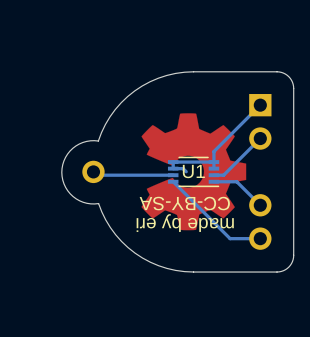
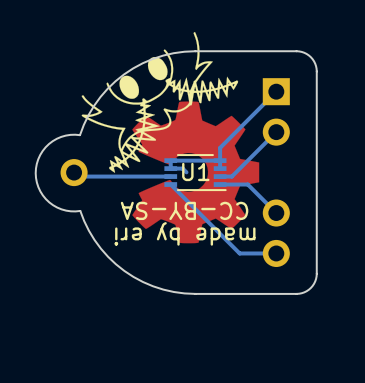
drawing: none -> [81, 31, 239, 173]

